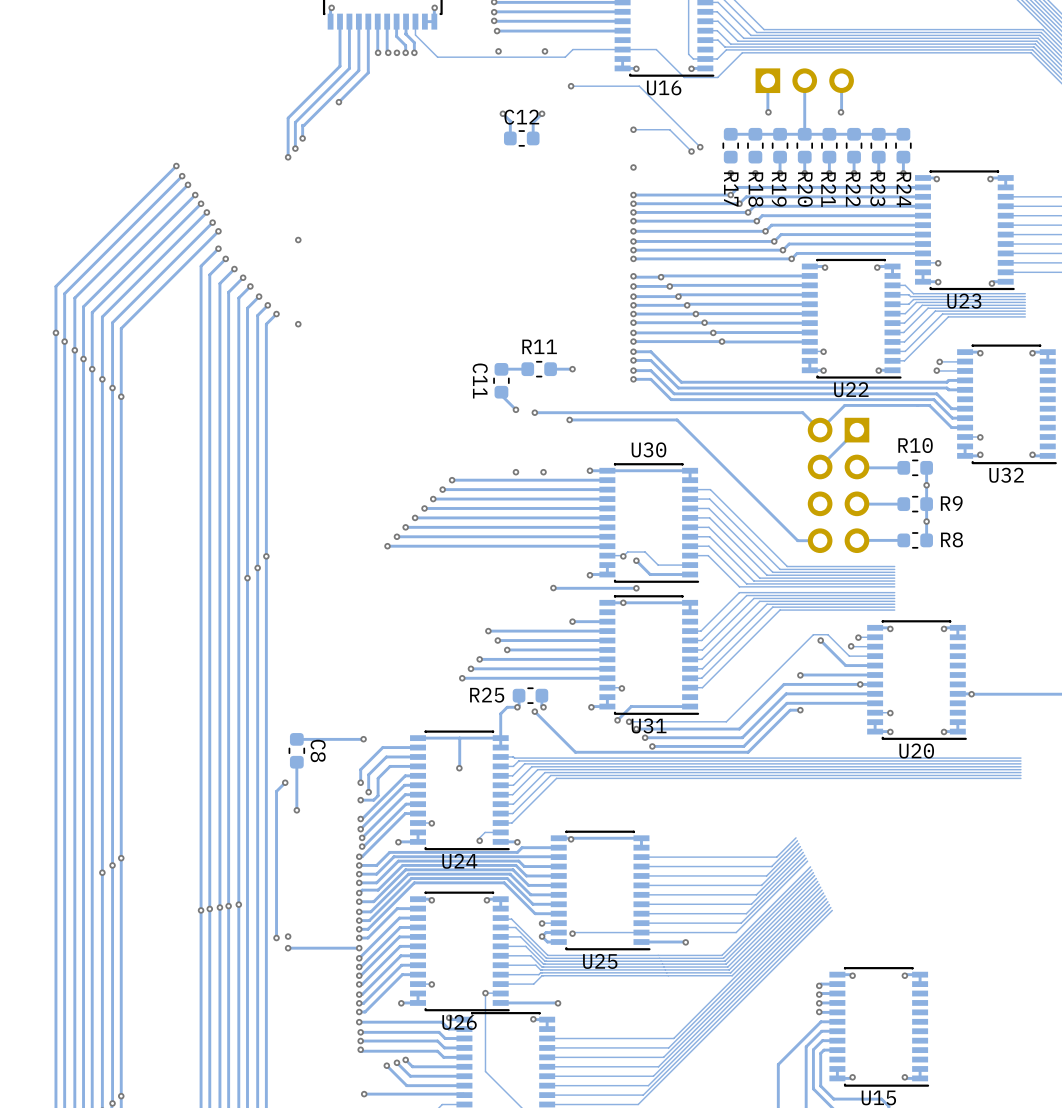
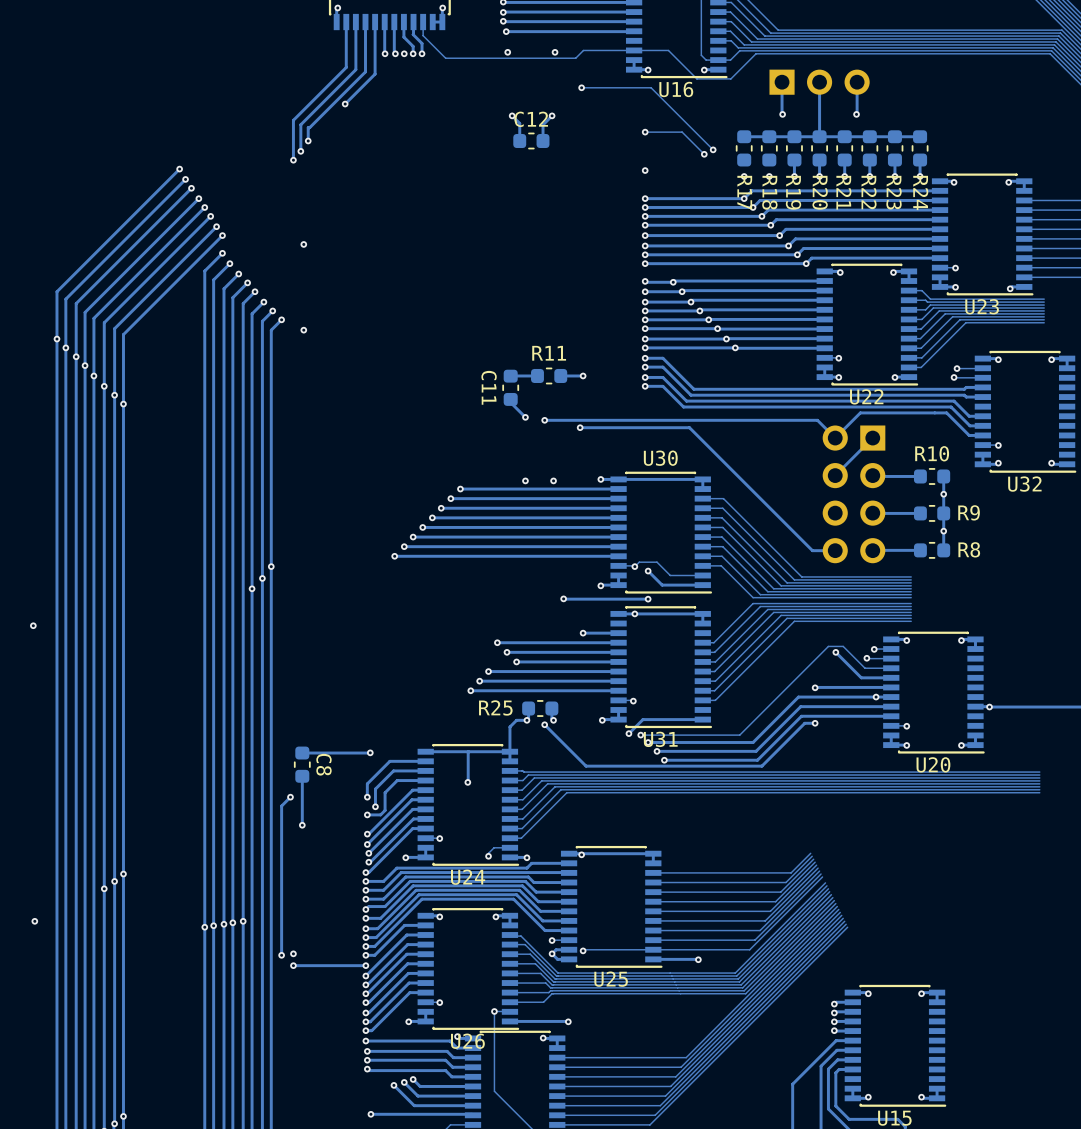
via: none -> (33, 625)
via: none -> (34, 921)

